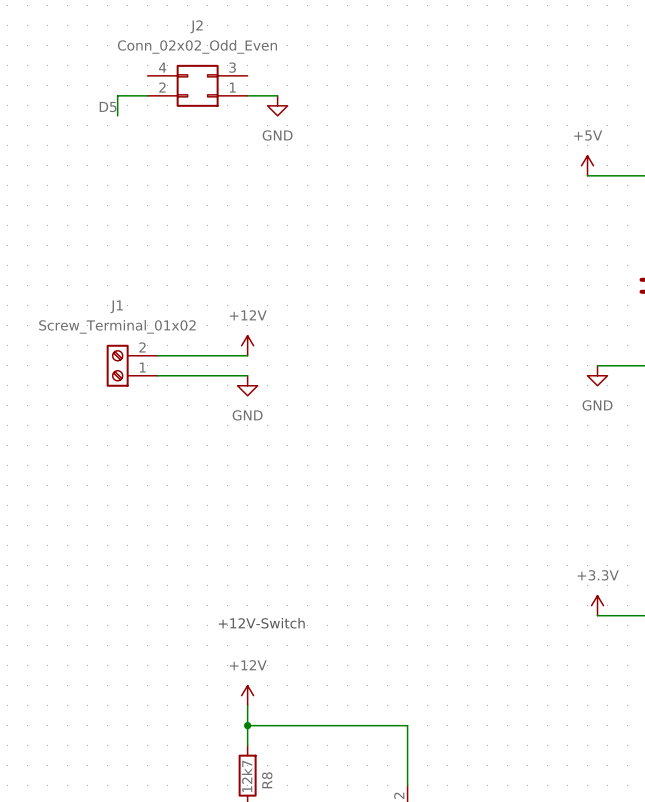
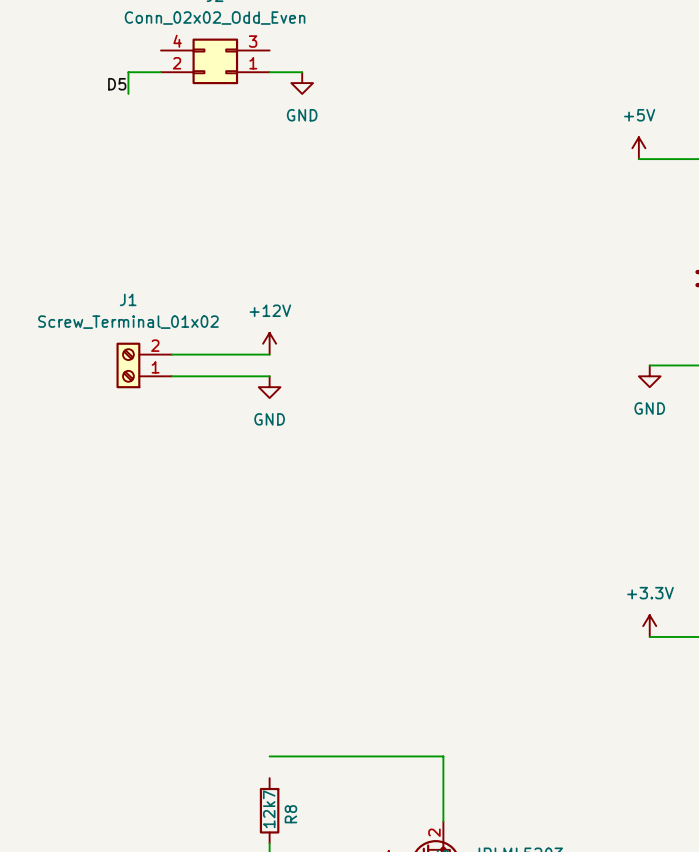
text: +12V-Switch (261, 623) -> none
power symbol: +12V (247, 695) -> none
wire: (247, 705) (247, 745) -> none
junction: (247, 725) -> none

